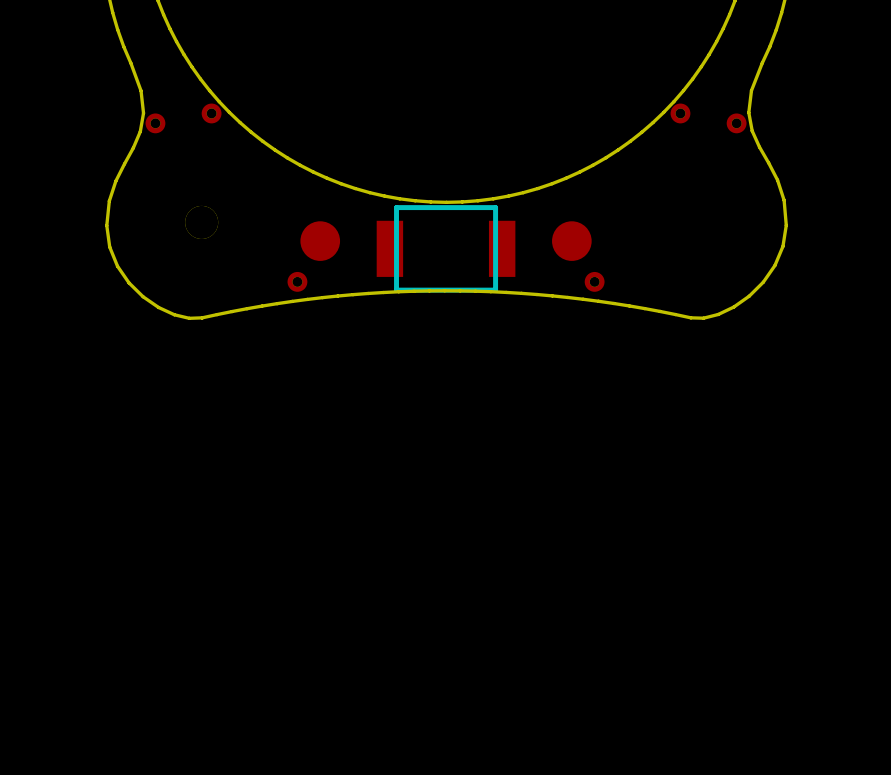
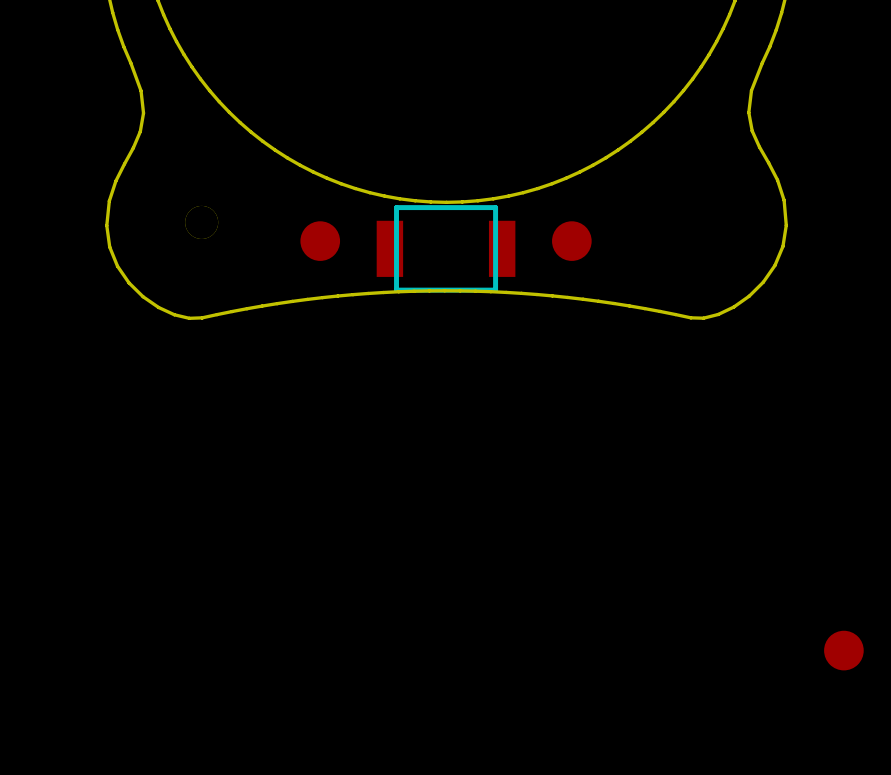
part: (211, 113) -> none
part: (680, 113) -> none
part: (155, 123) -> none
part: (736, 123) -> none
part: (297, 281) -> none
part: (594, 281) -> none
part: none -> (843, 650)

